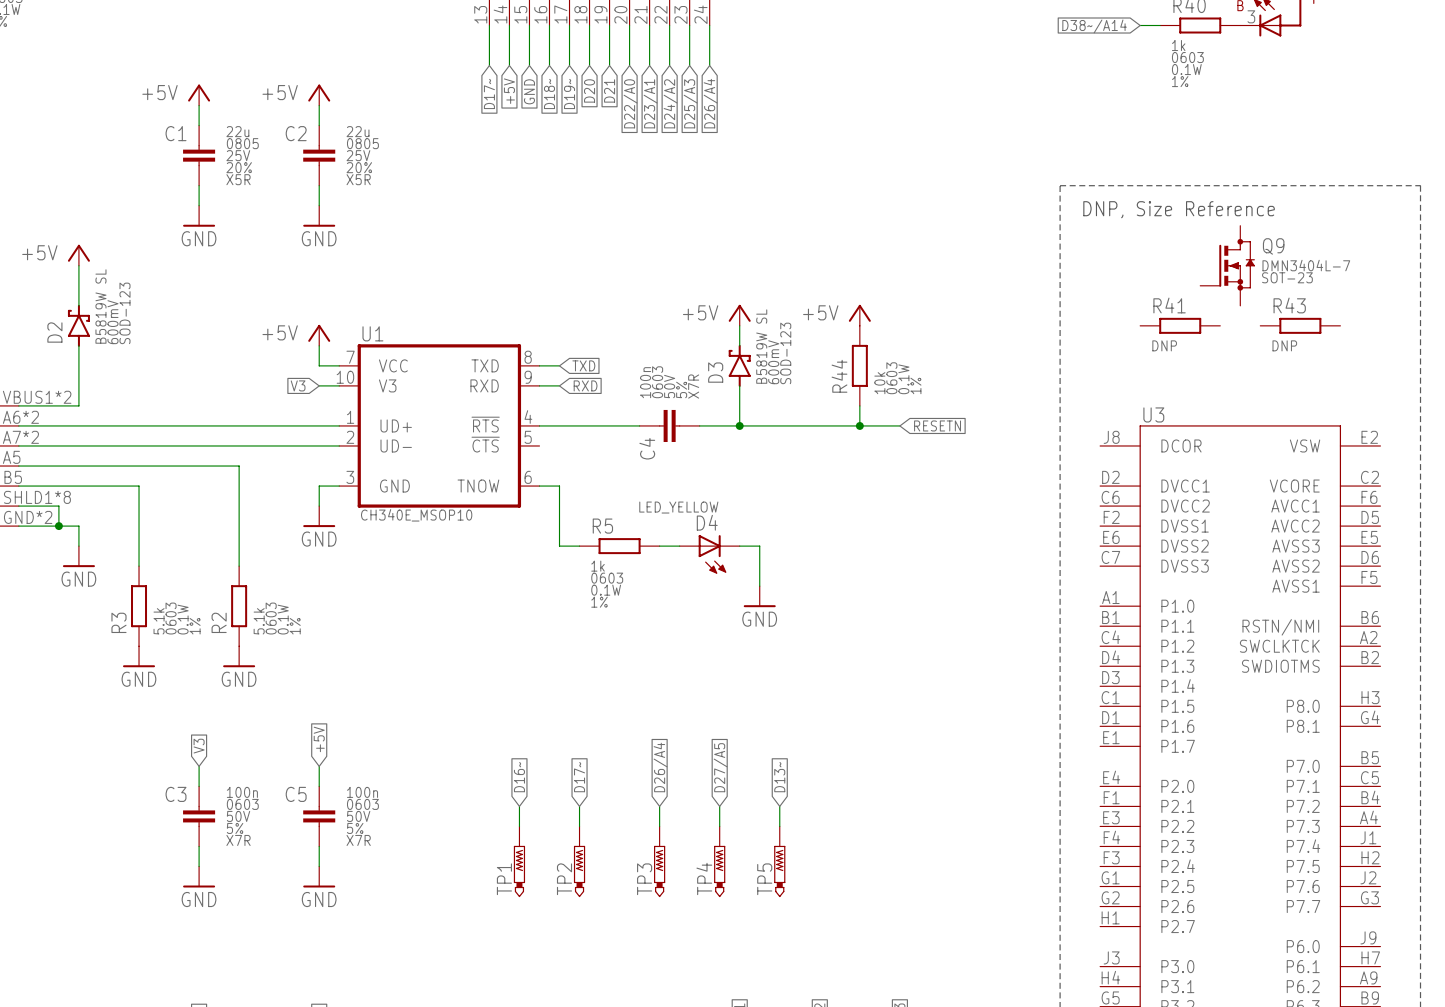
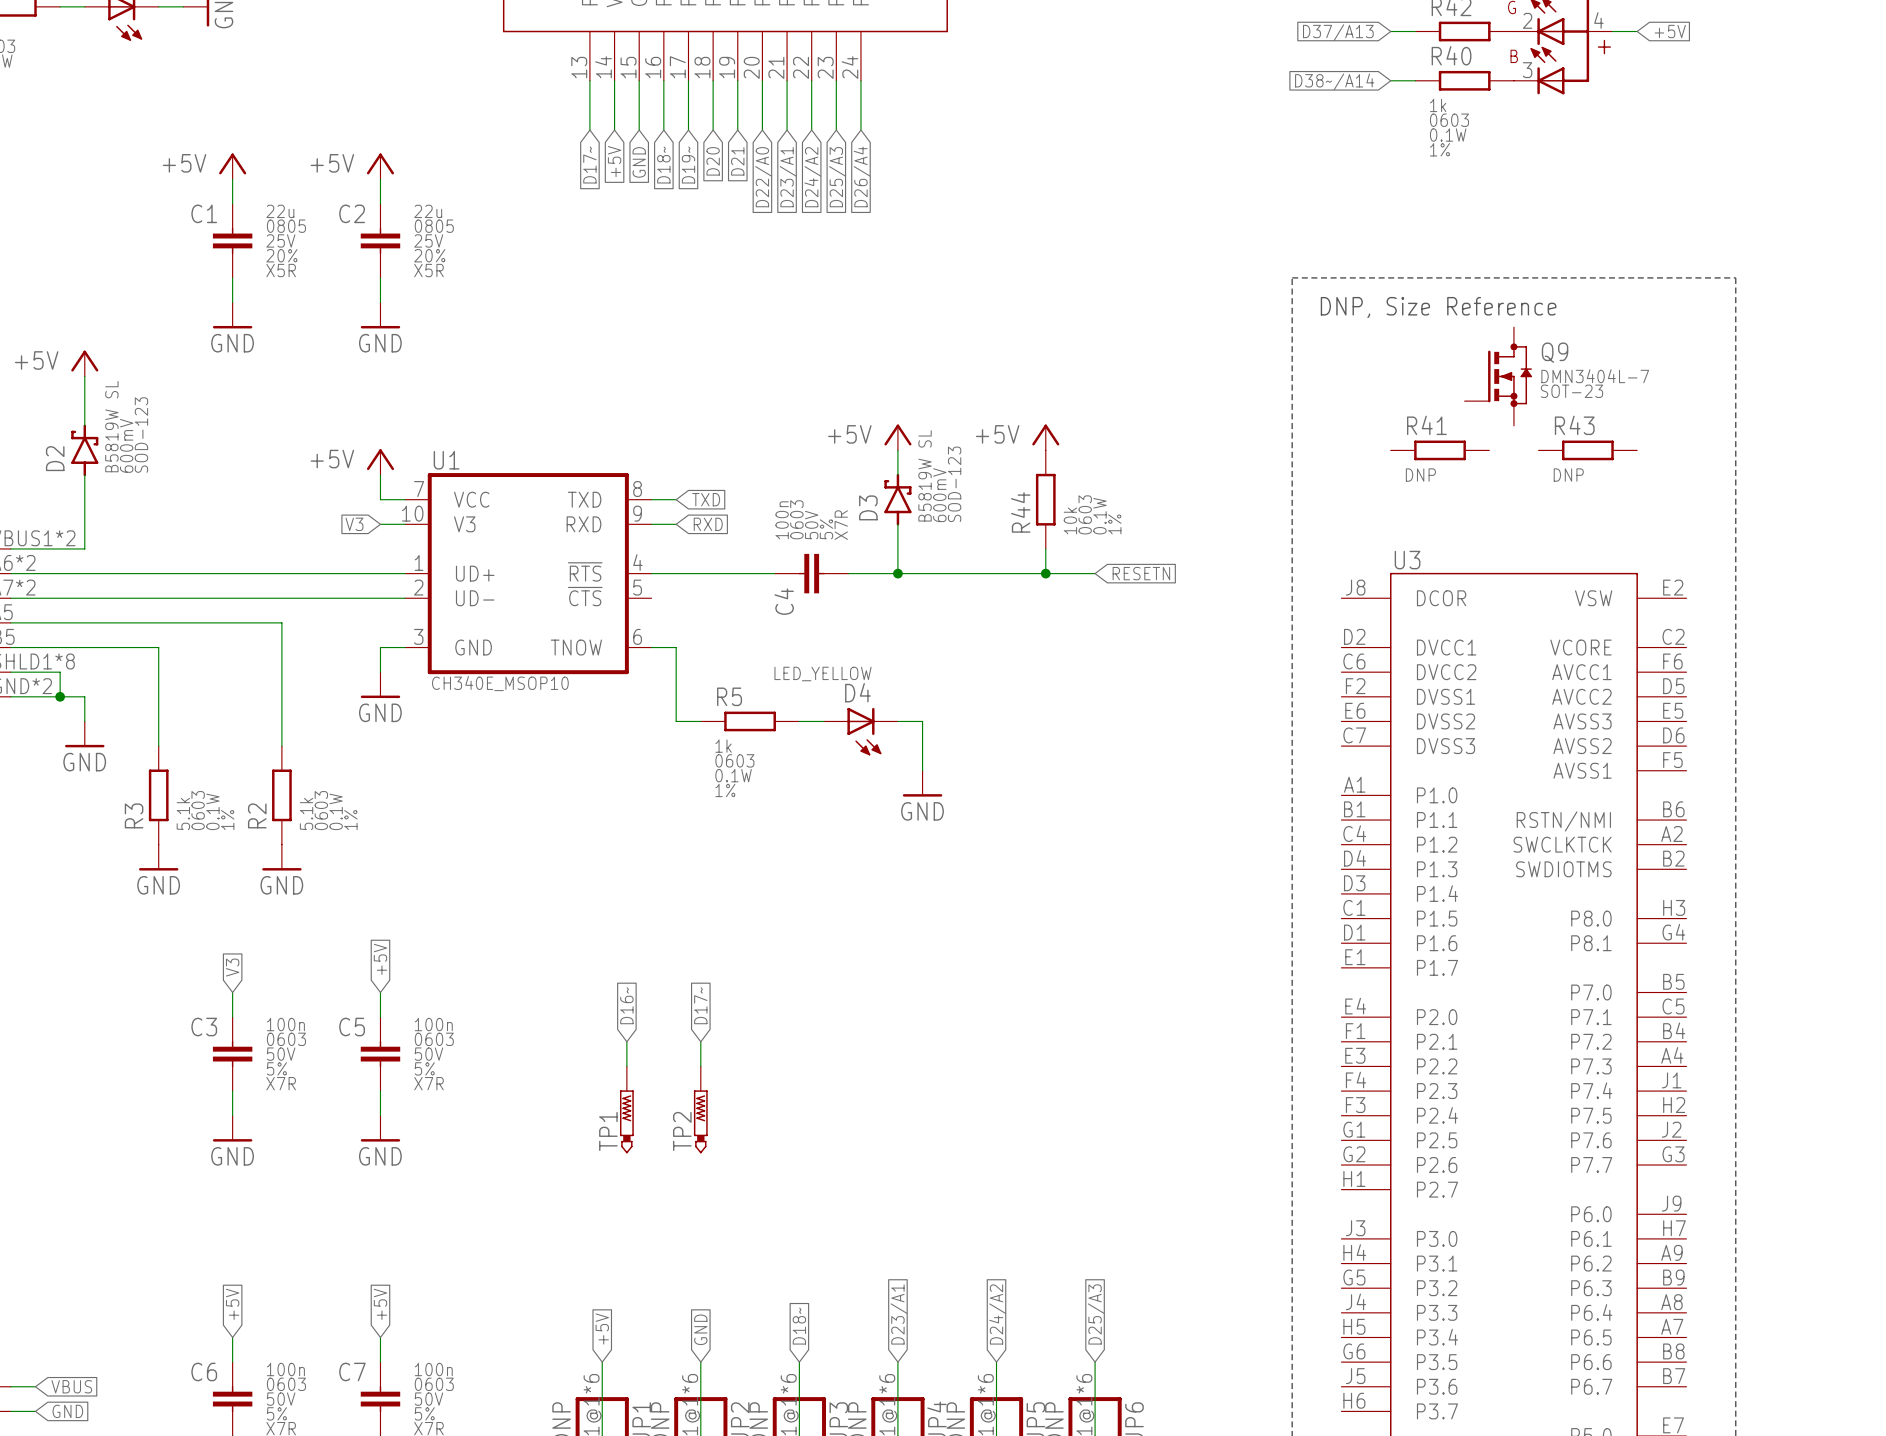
global label: D26/A4 (660, 767) -> none
global label: D27/A5 (720, 767) -> none
global label: D13~ (779, 777) -> none
wire: (659, 806) (659, 826) -> none
wire: (719, 806) (719, 826) -> none
wire: (779, 806) (779, 826) -> none
TP3: (659, 861) -> none
TP4: (719, 861) -> none
TP5: (779, 861) -> none

